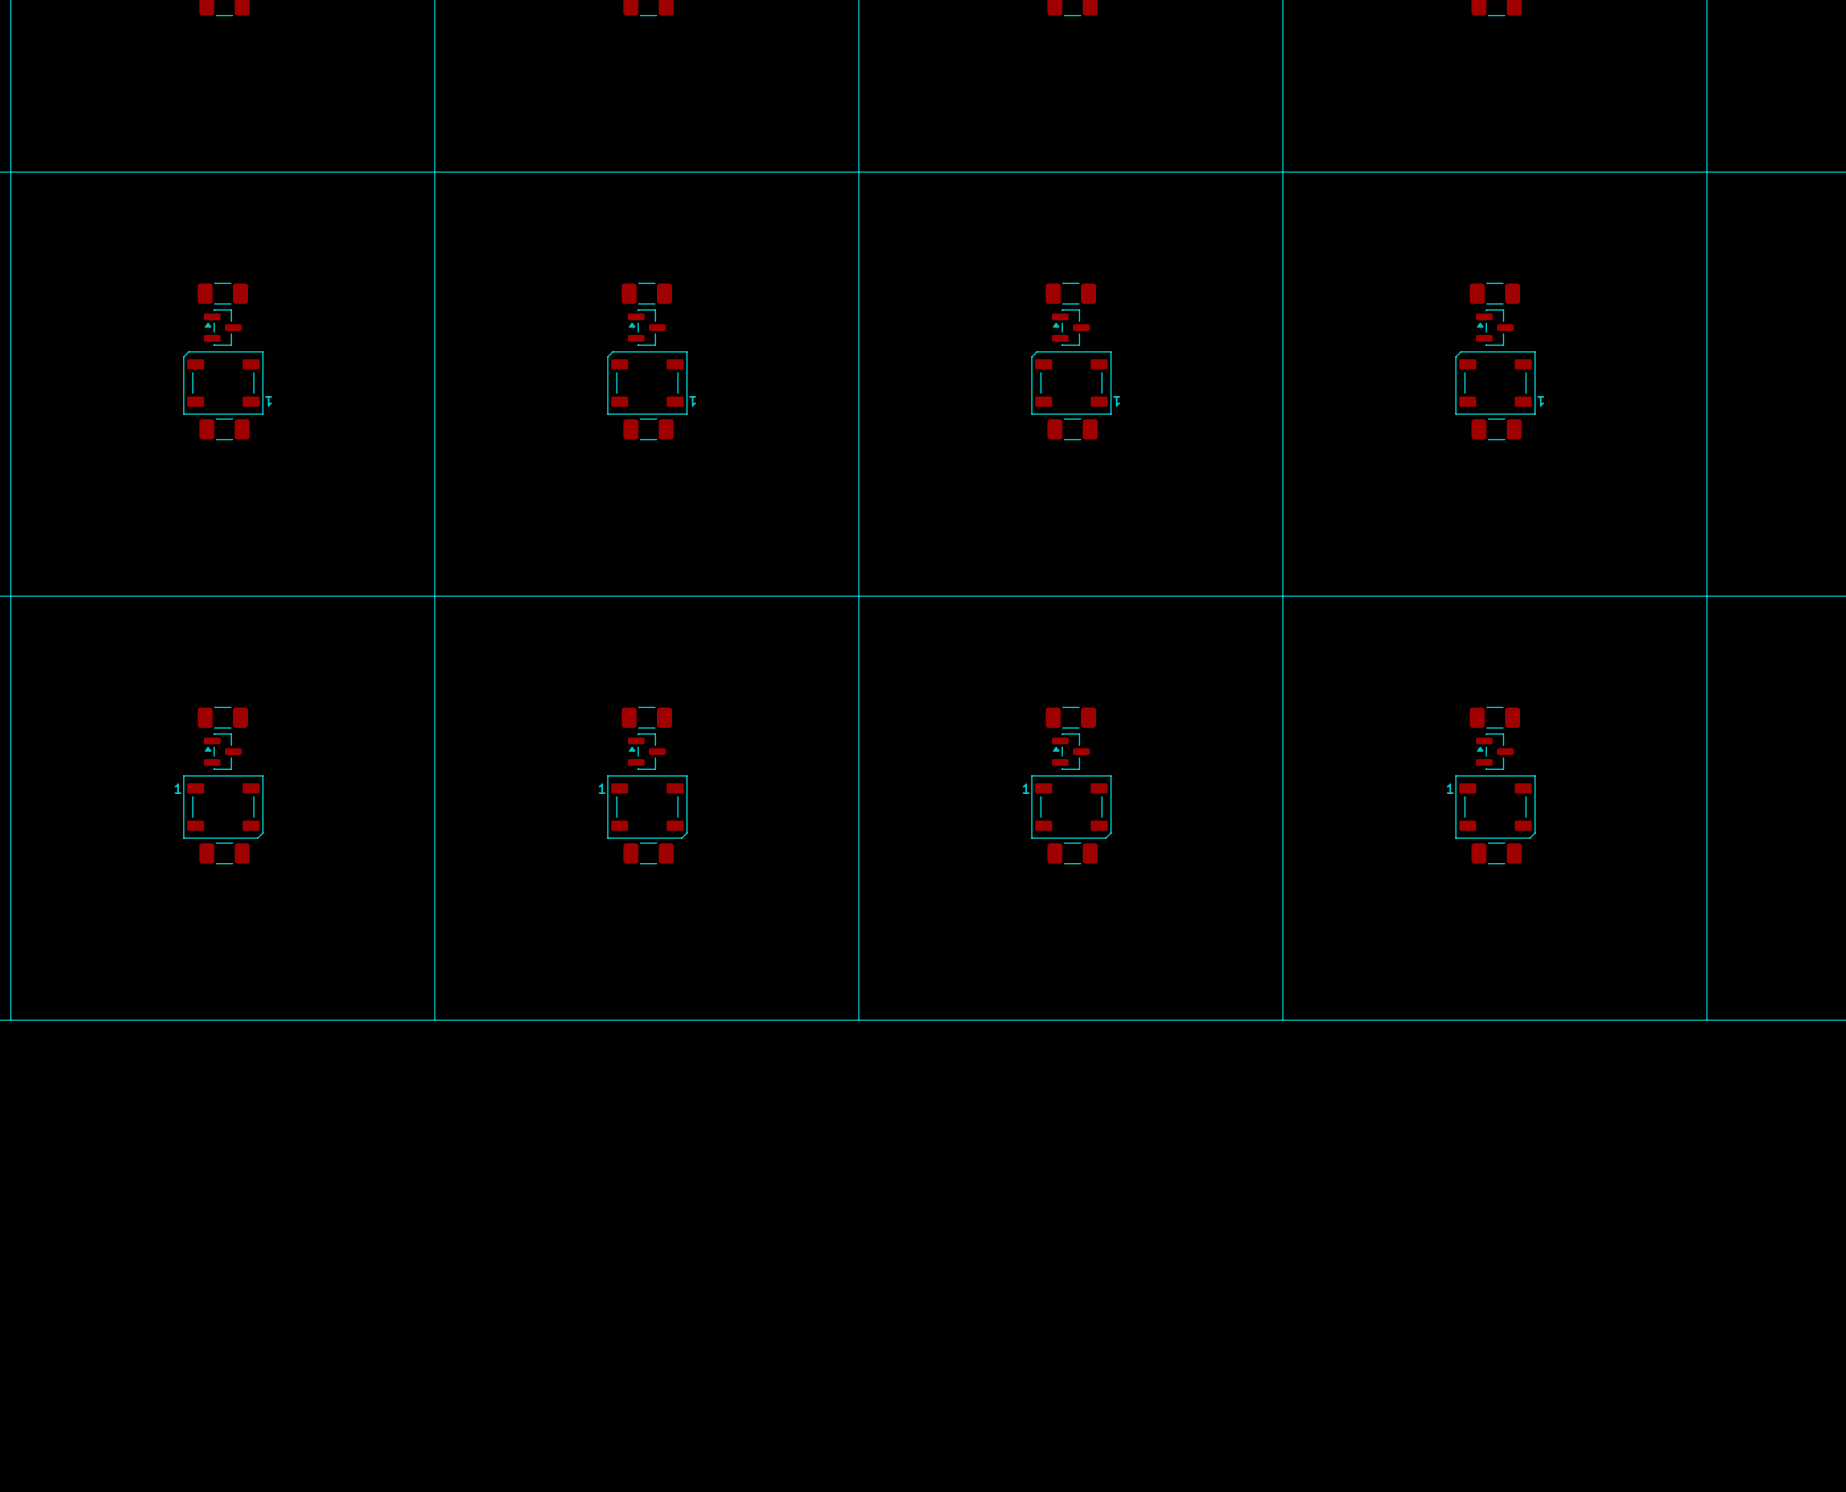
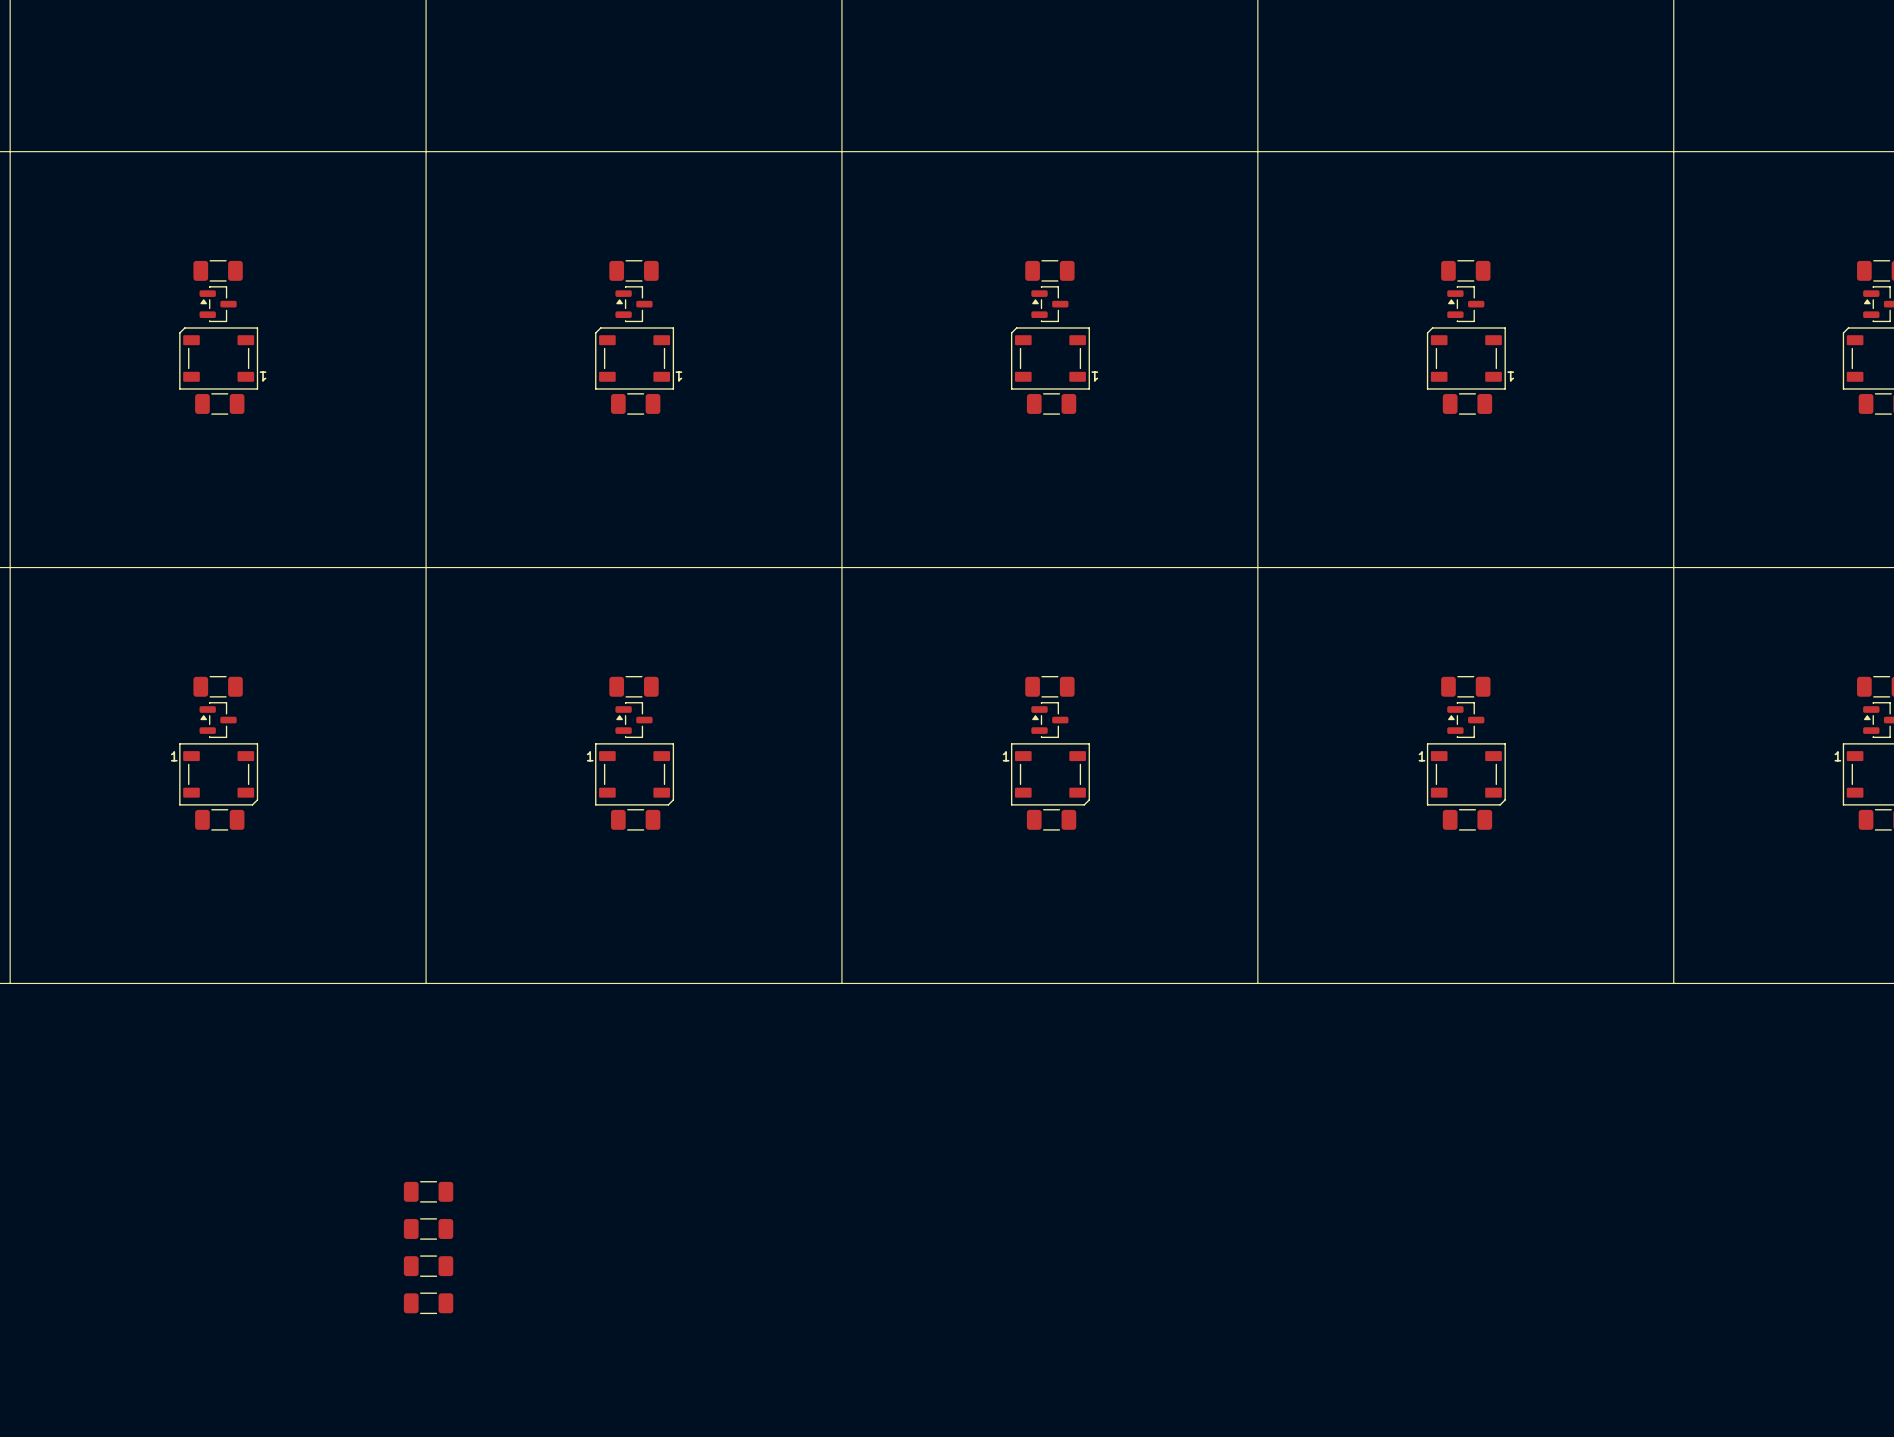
part: none -> (428, 1191)
part: none -> (428, 1228)
part: none -> (428, 1266)
part: none -> (428, 1303)

